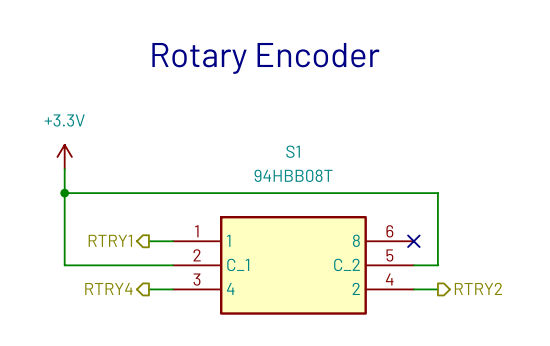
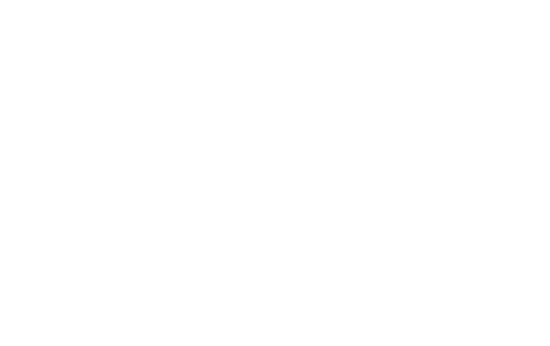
text: Rotary Encoder (265, 58) -> none
power symbol: +3.3V (64, 156) -> none
wire: (64, 169) (64, 265) (173, 265) -> none
wire: (64, 193) (437, 193) (437, 265) (413, 265) -> none
junction: (64, 193) -> none
hierarchical label: RTRY1 (110, 240) -> none
wire: (148, 241) (173, 241) -> none
no-connect mark: (413, 241) -> none
S1: 94HBB08T (293, 265) -> none
hierarchical label: RTRY4 (108, 288) -> none
hierarchical label: RTRY2 (478, 288) -> none
wire: (148, 289) (173, 289) -> none
wire: (413, 289) (437, 289) -> none

